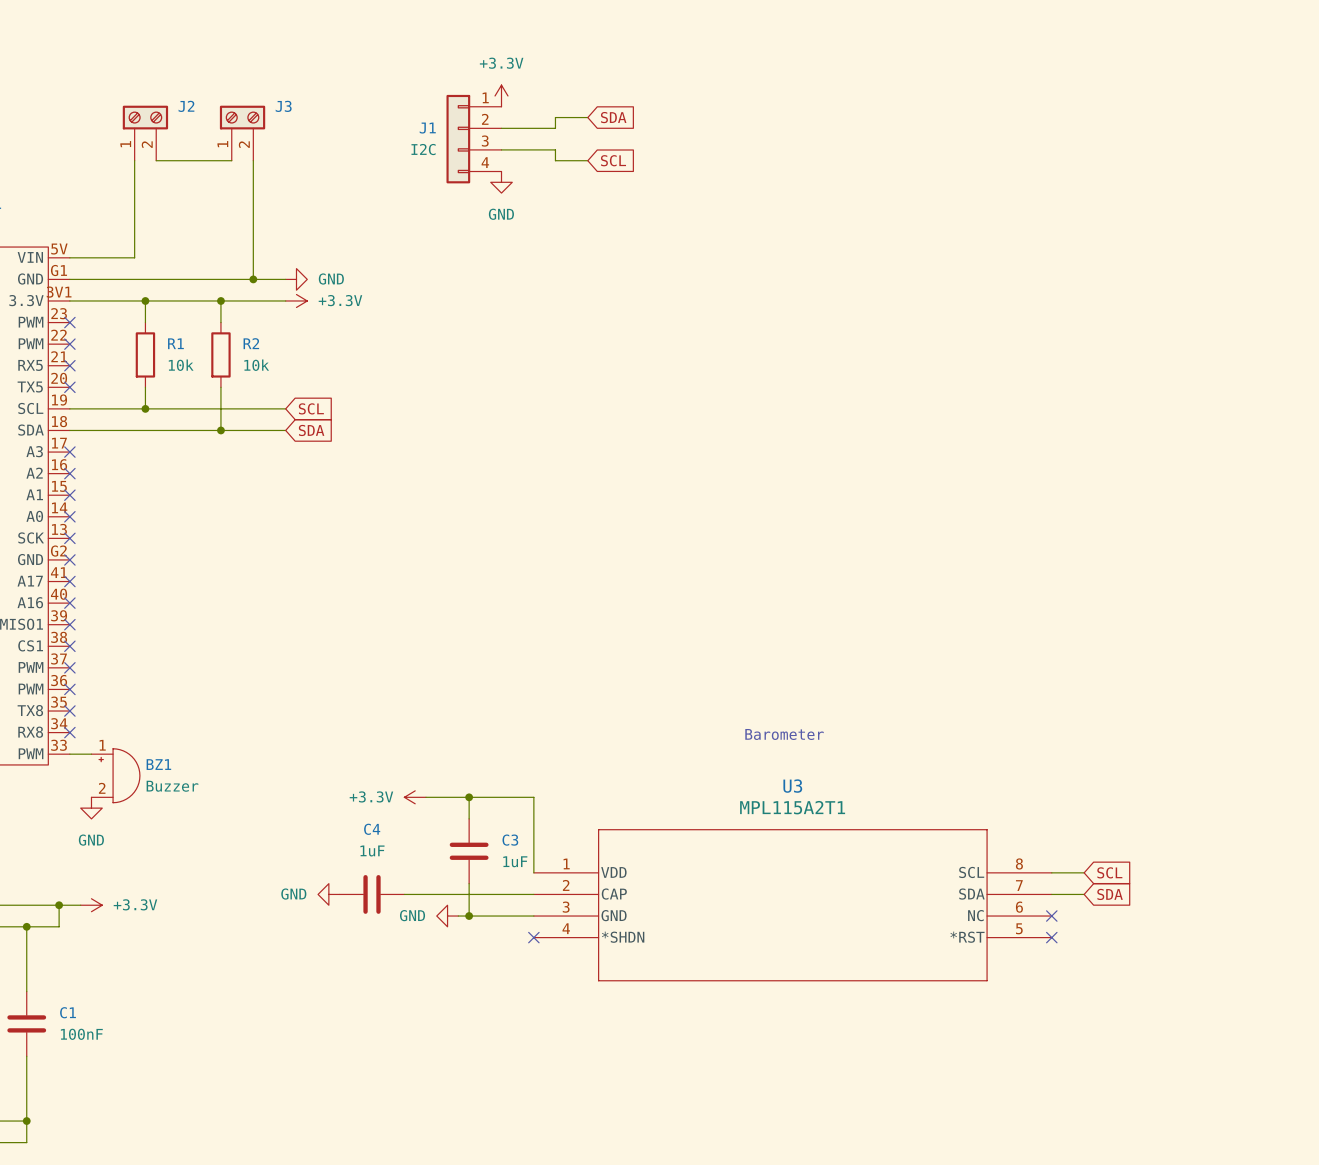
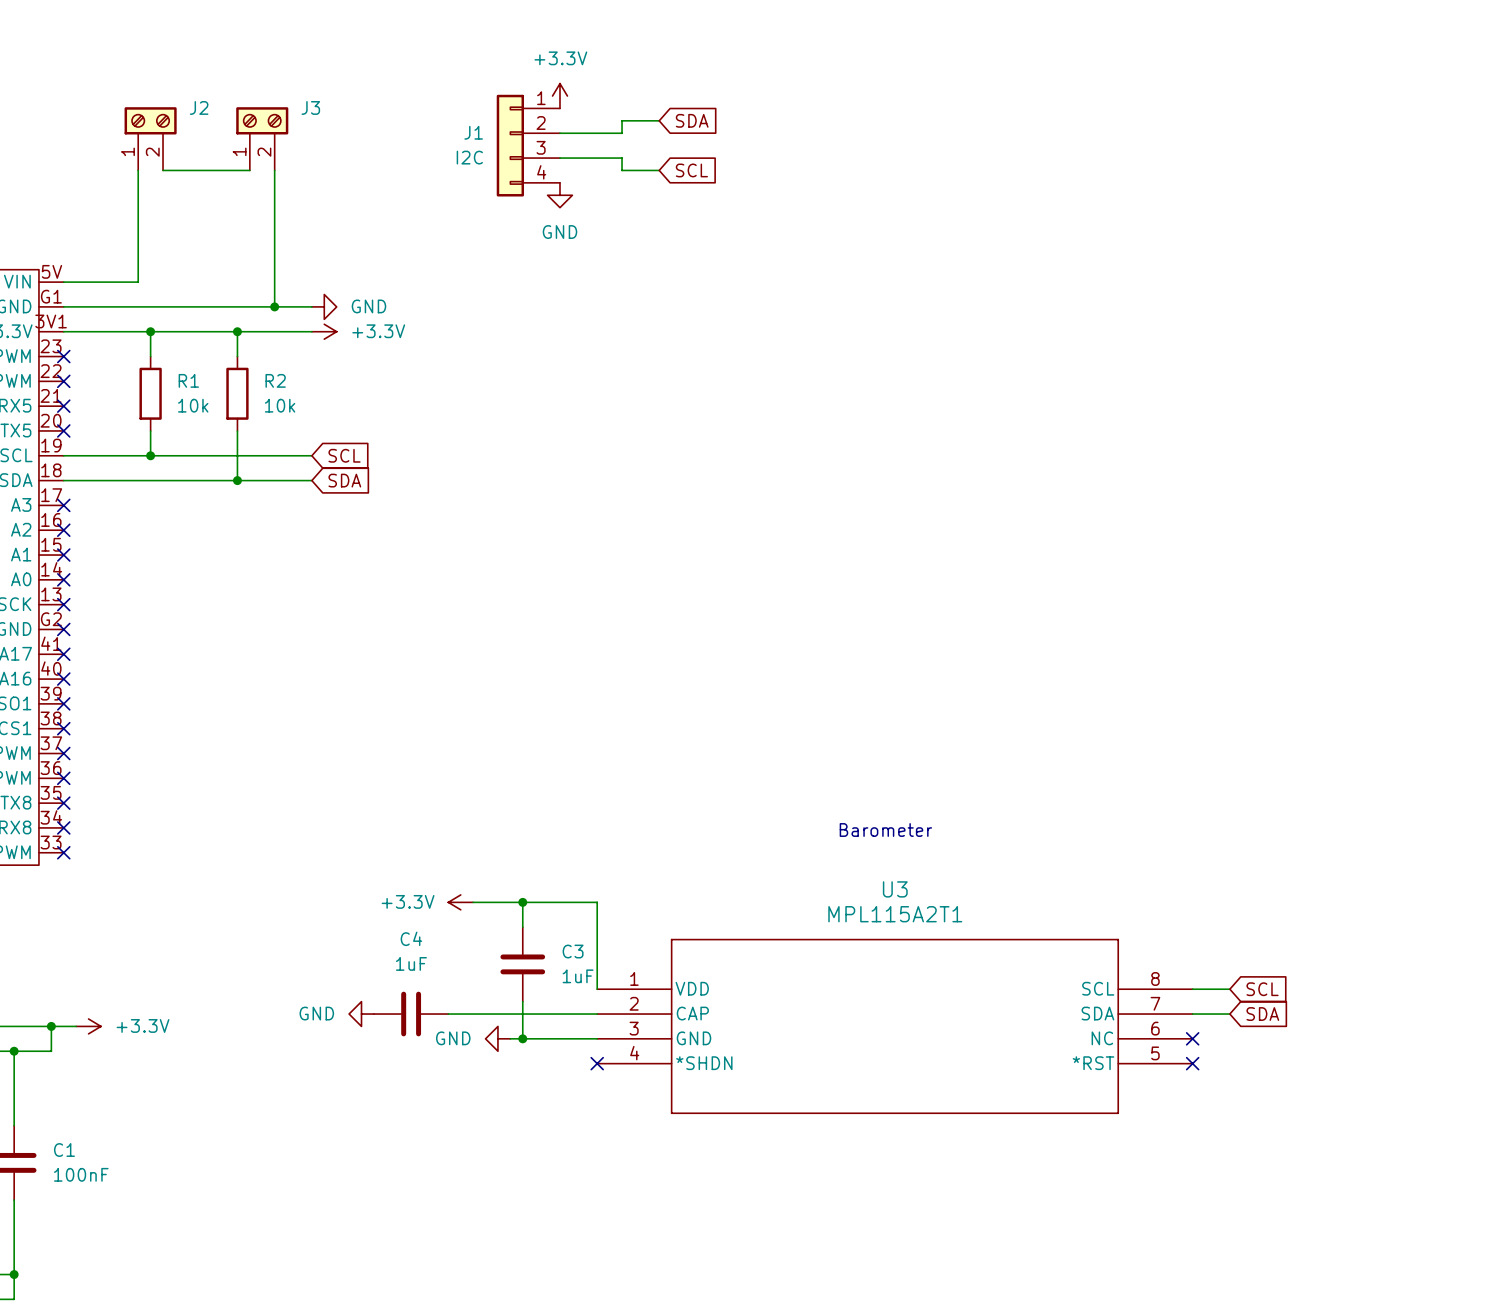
wire: (69, 754) (91, 754) -> none
no-connect mark: none -> (63, 852)
BZ1: Buzzer (115, 775) -> none
power symbol: GND (91, 808) -> none

